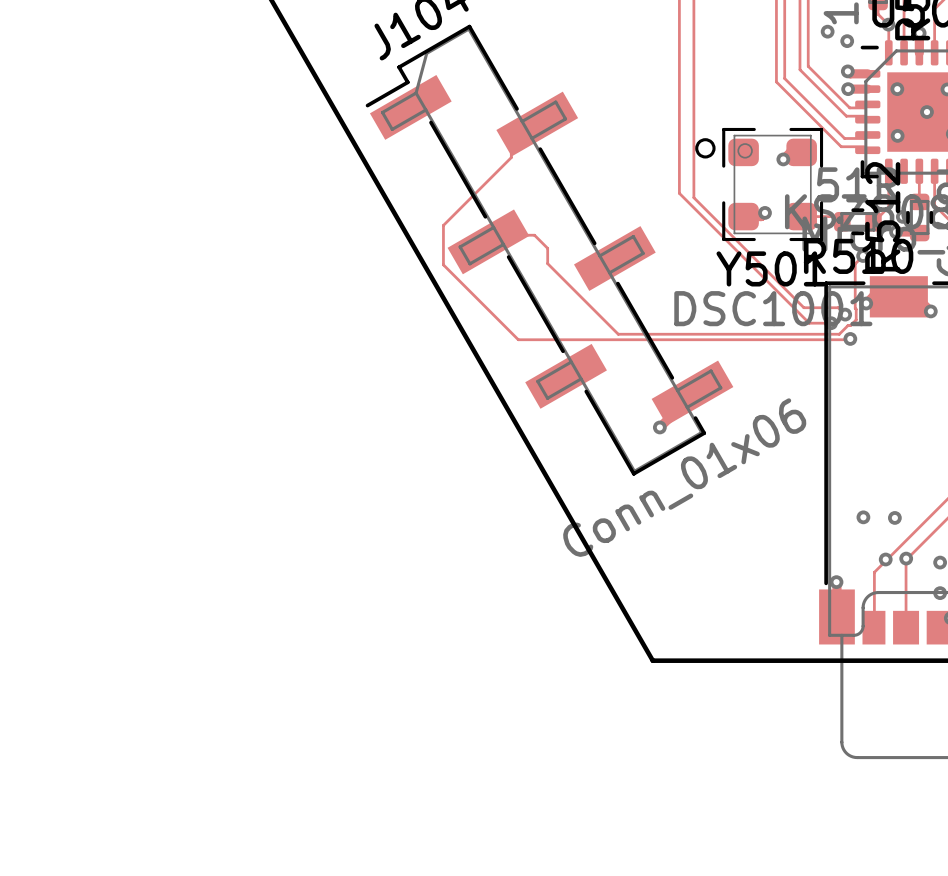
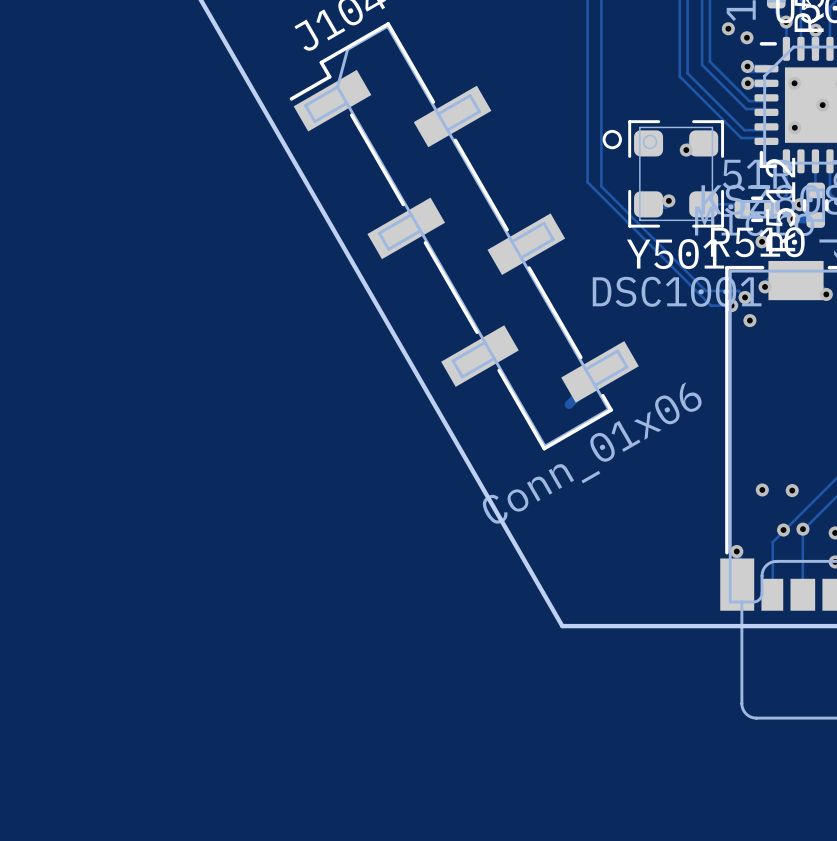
track: (511, 153) (511, 157) (443, 225) (443, 264) (518, 339) (850, 338) -> none
track: (527, 235) (534, 235) (547, 248) (547, 263) (618, 334) (839, 334) (856, 319) (855, 263) (863, 256) -> none
via: (659, 427) -> none

